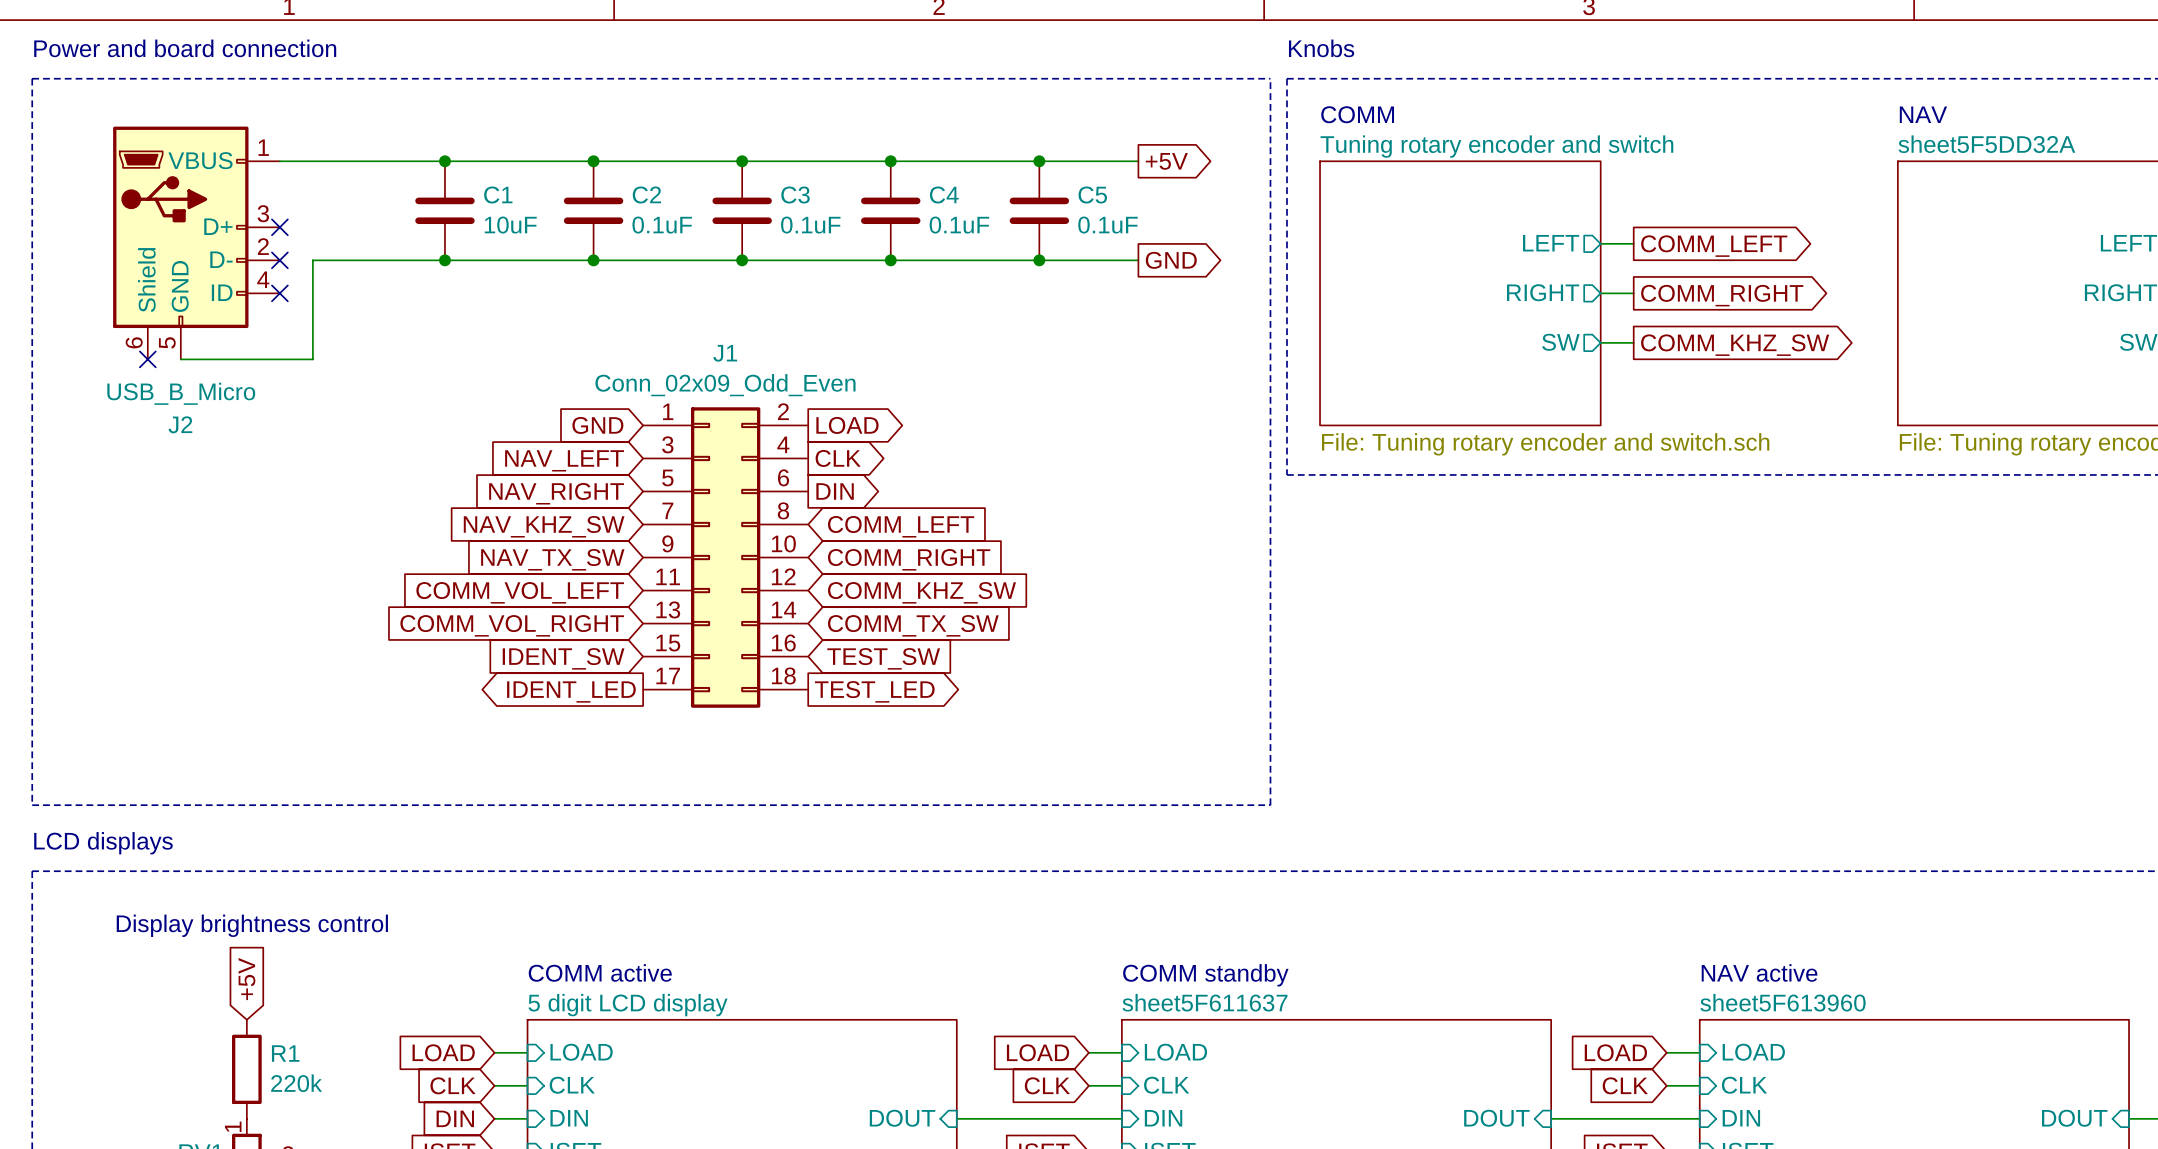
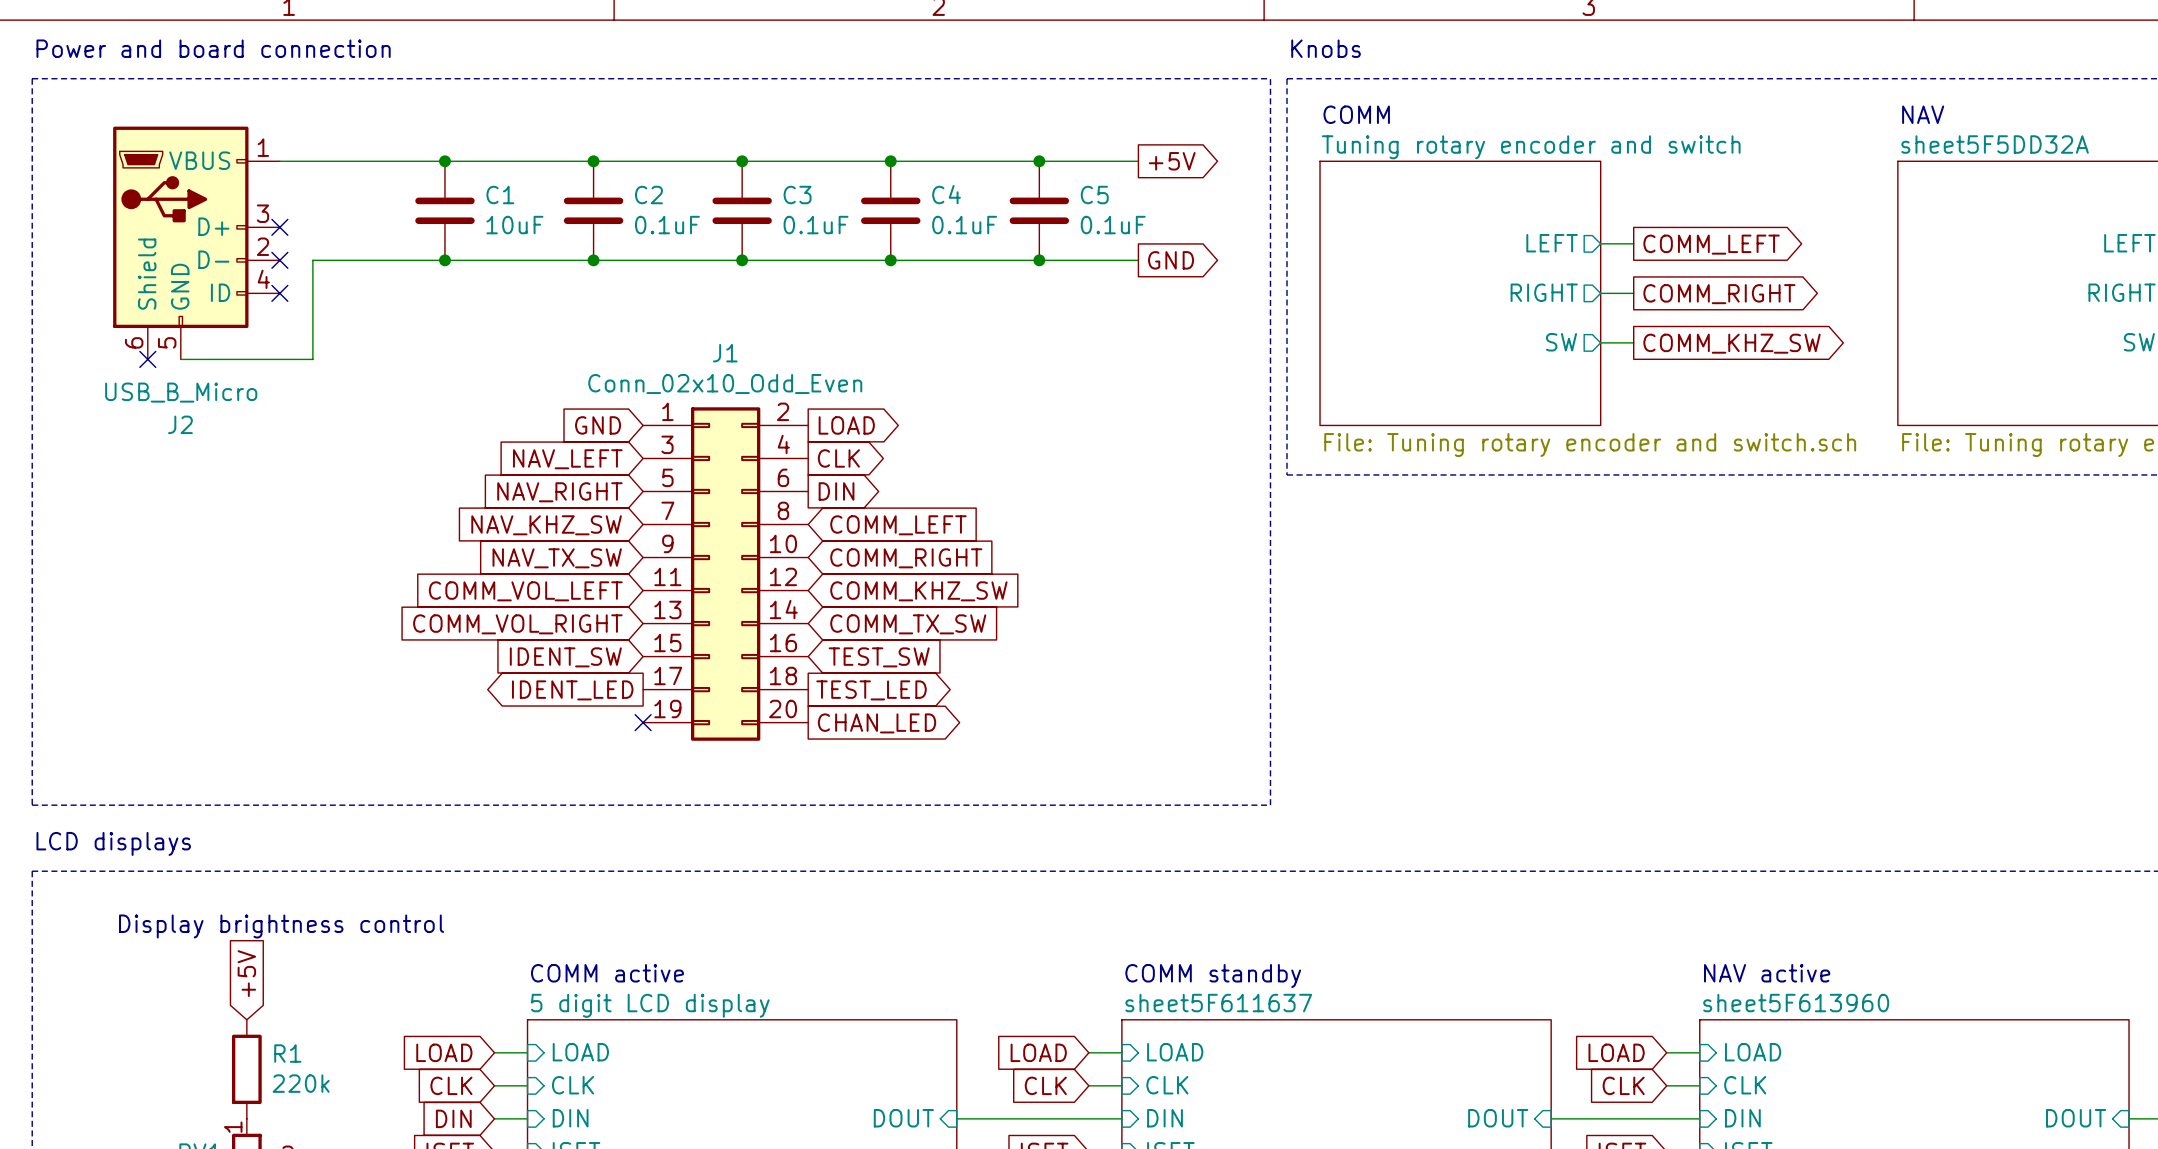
J1 value: Conn_02x09_Odd_Even (725, 385) -> Conn_02x10_Odd_Even (725, 384)
J1 symbol: [643, 407, 809, 708] -> [643, 407, 809, 741]
no-connect mark: none -> (643, 722)
global label: none -> CHAN_LED (877, 723)

